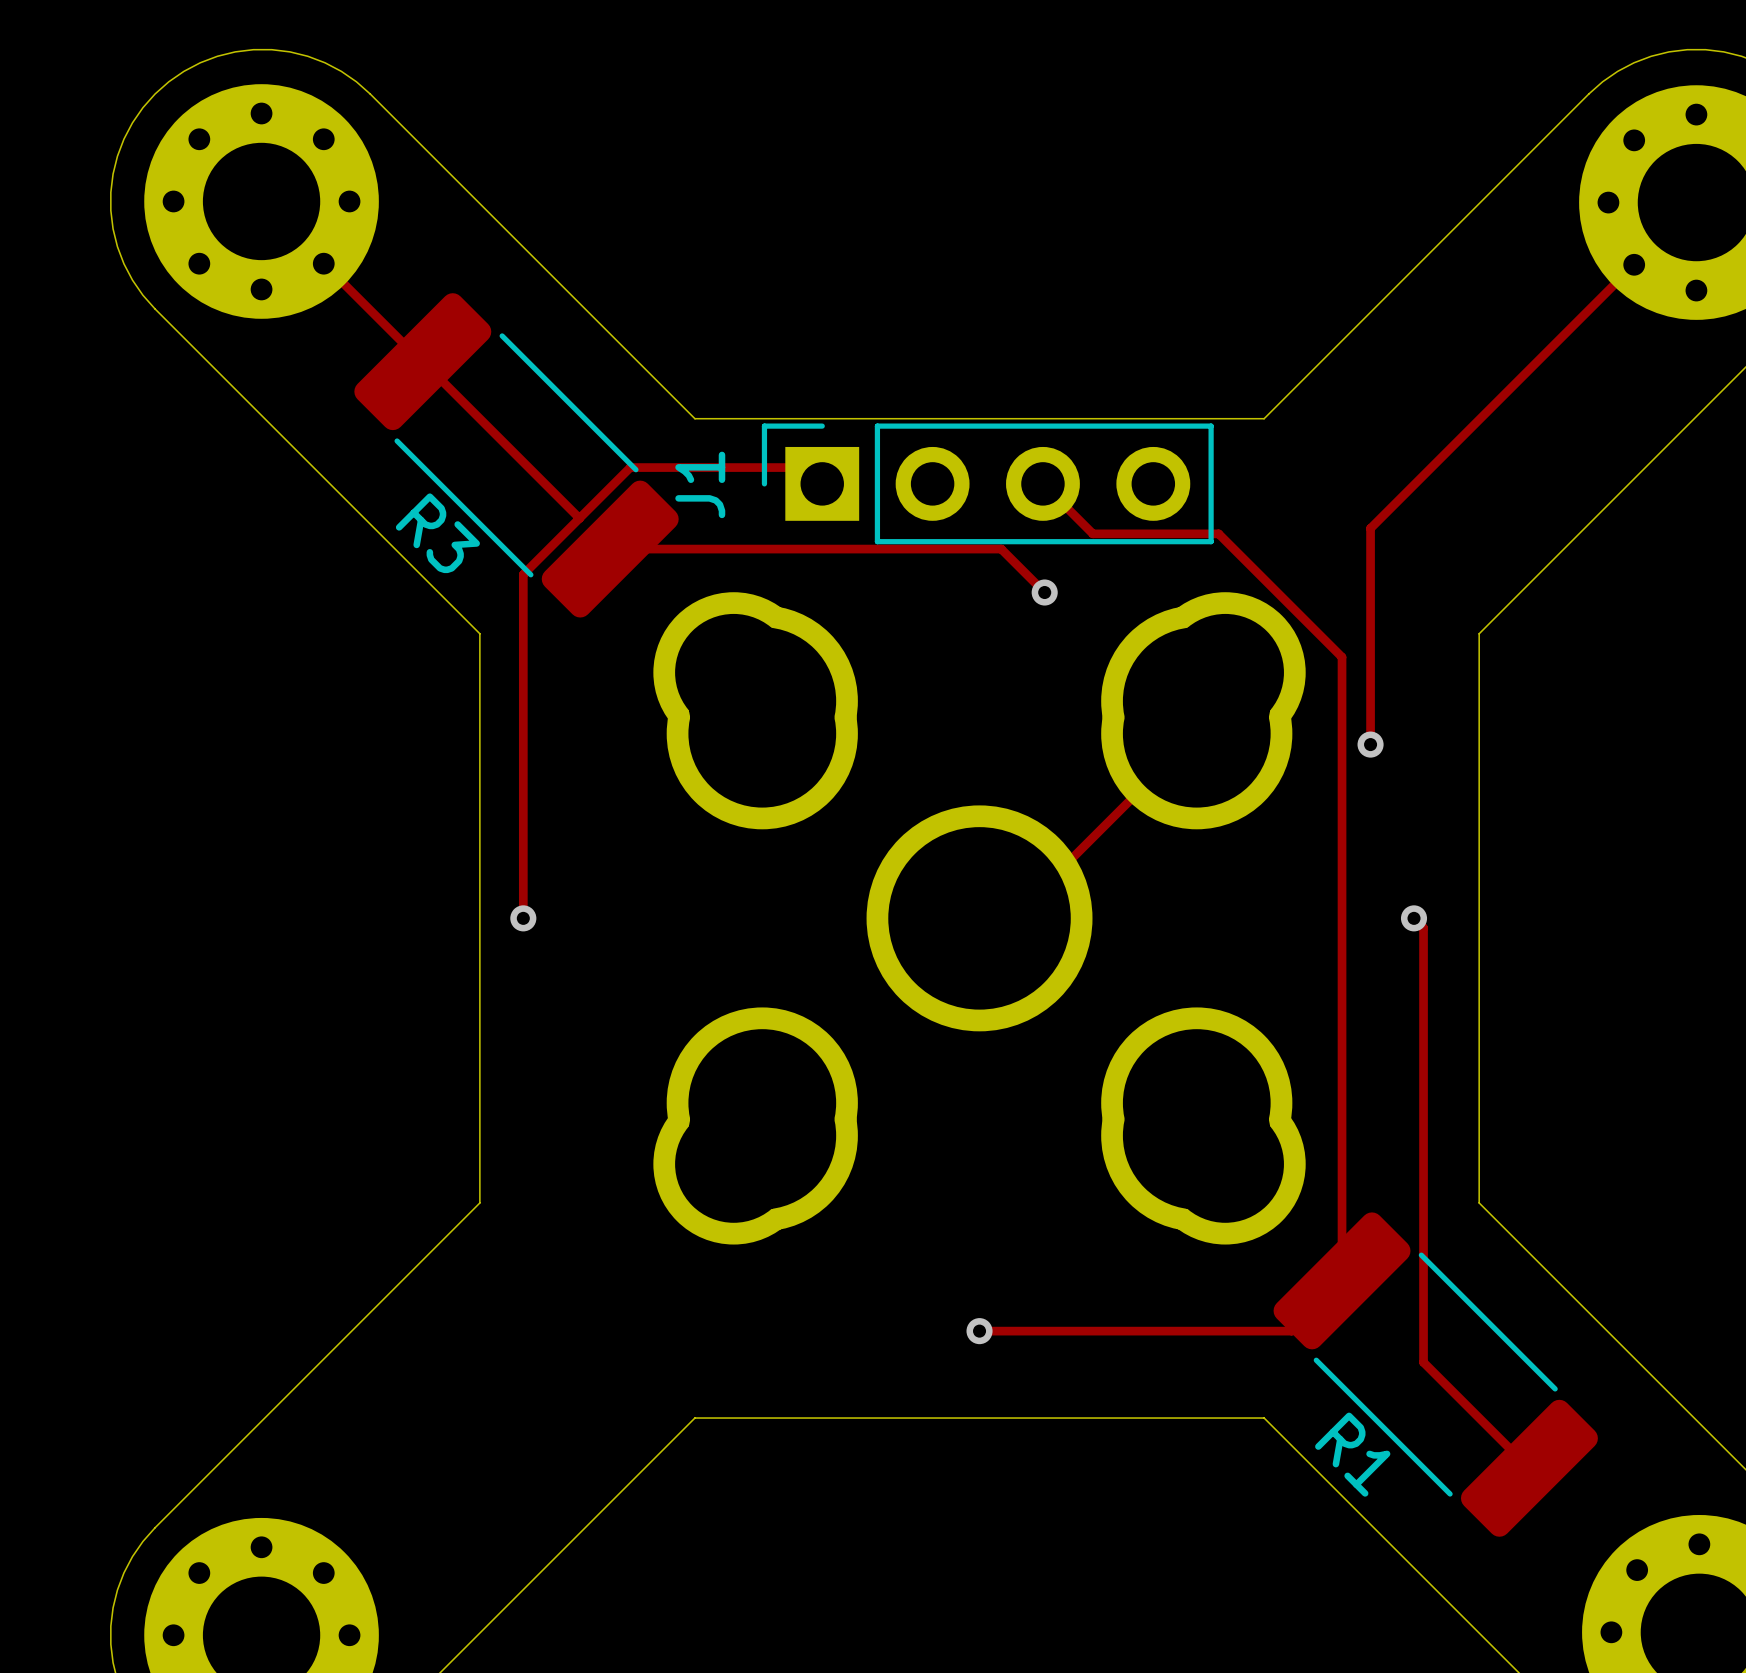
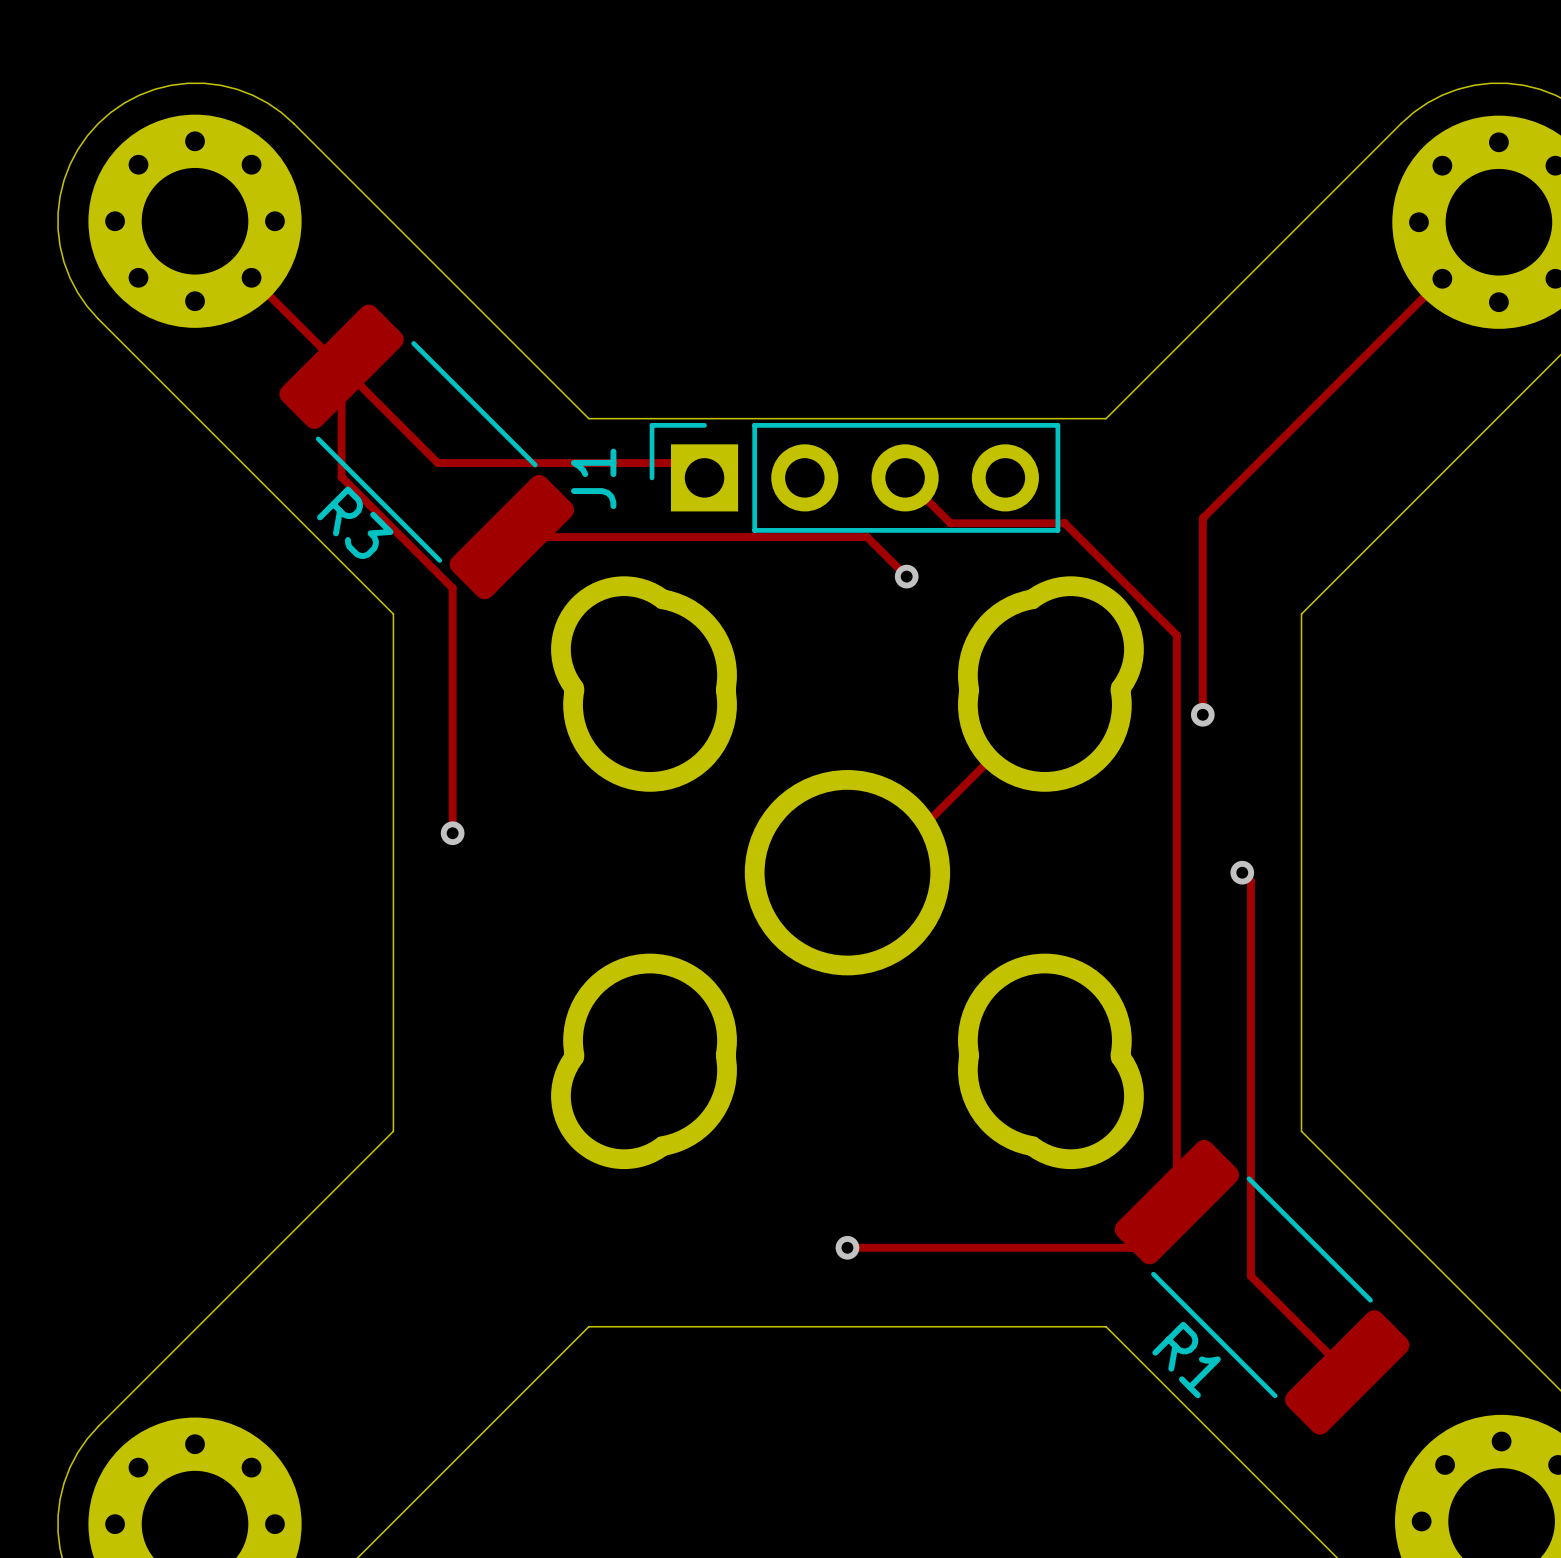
track: none -> (341, 366) (341, 477) (452, 588) (452, 833)
track: (528, 467) (579, 518) -> (437, 463) (530, 463)
track: (630, 467) (523, 574) (523, 918) -> none
via position: (523, 918) -> (452, 833)

